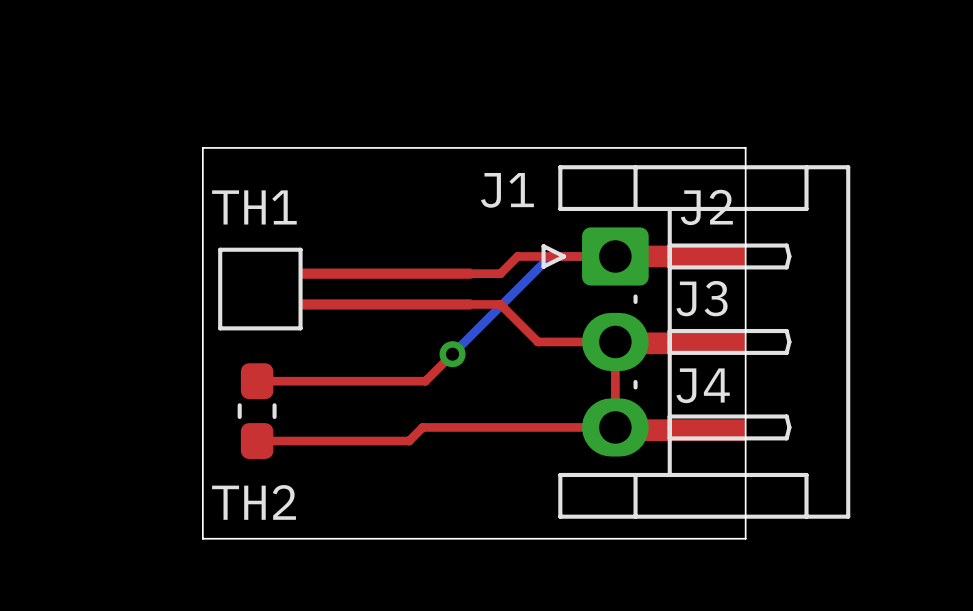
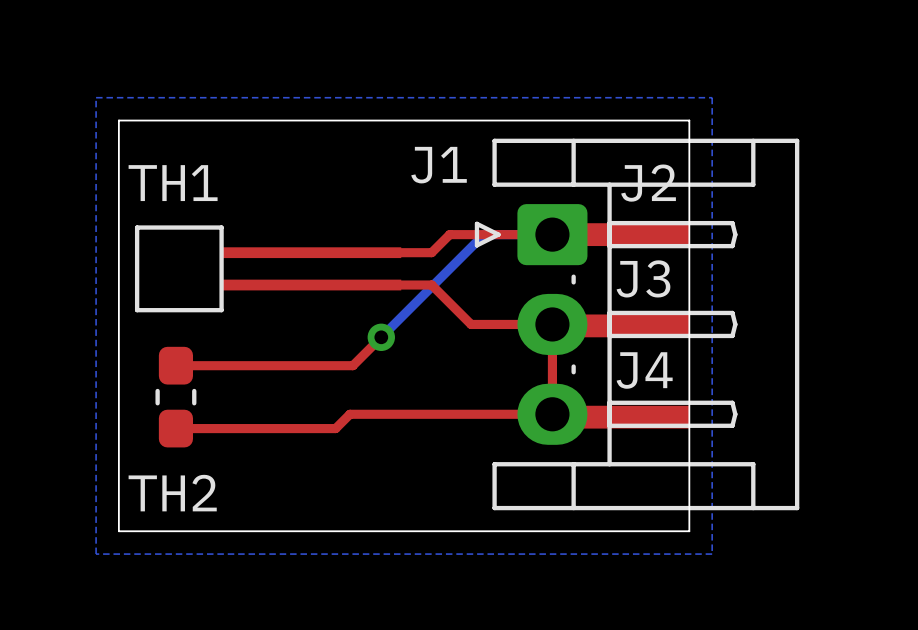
bottom zone outline: none -> (96, 97) (96, 554) (712, 554) (712, 97) (96, 97)

